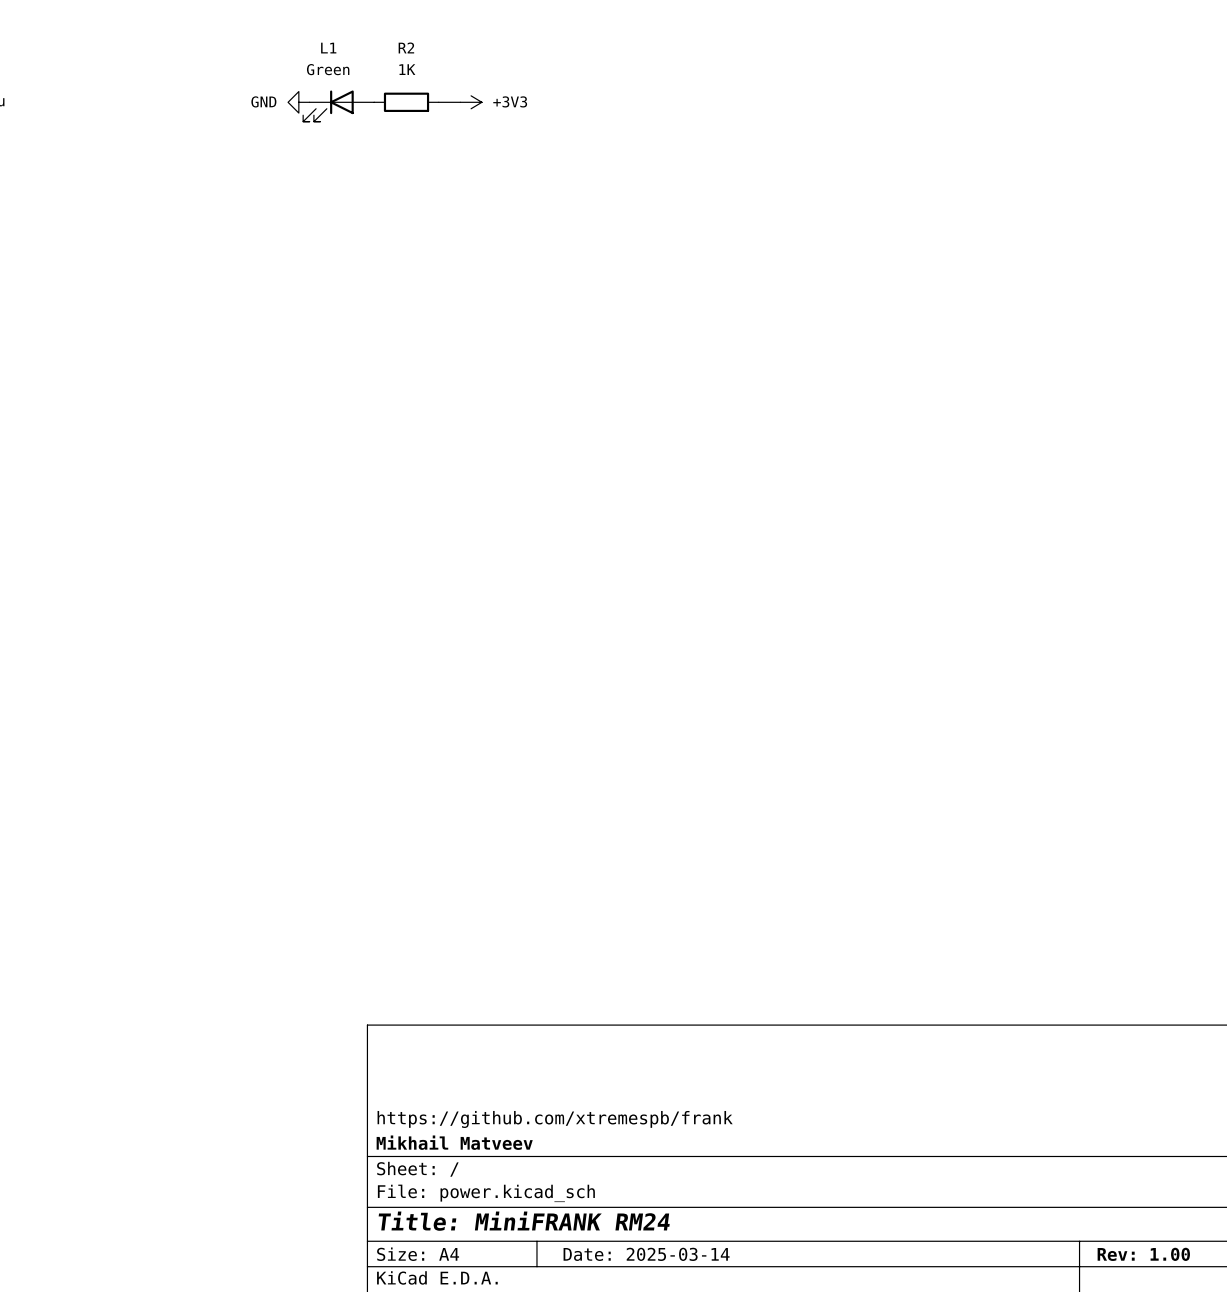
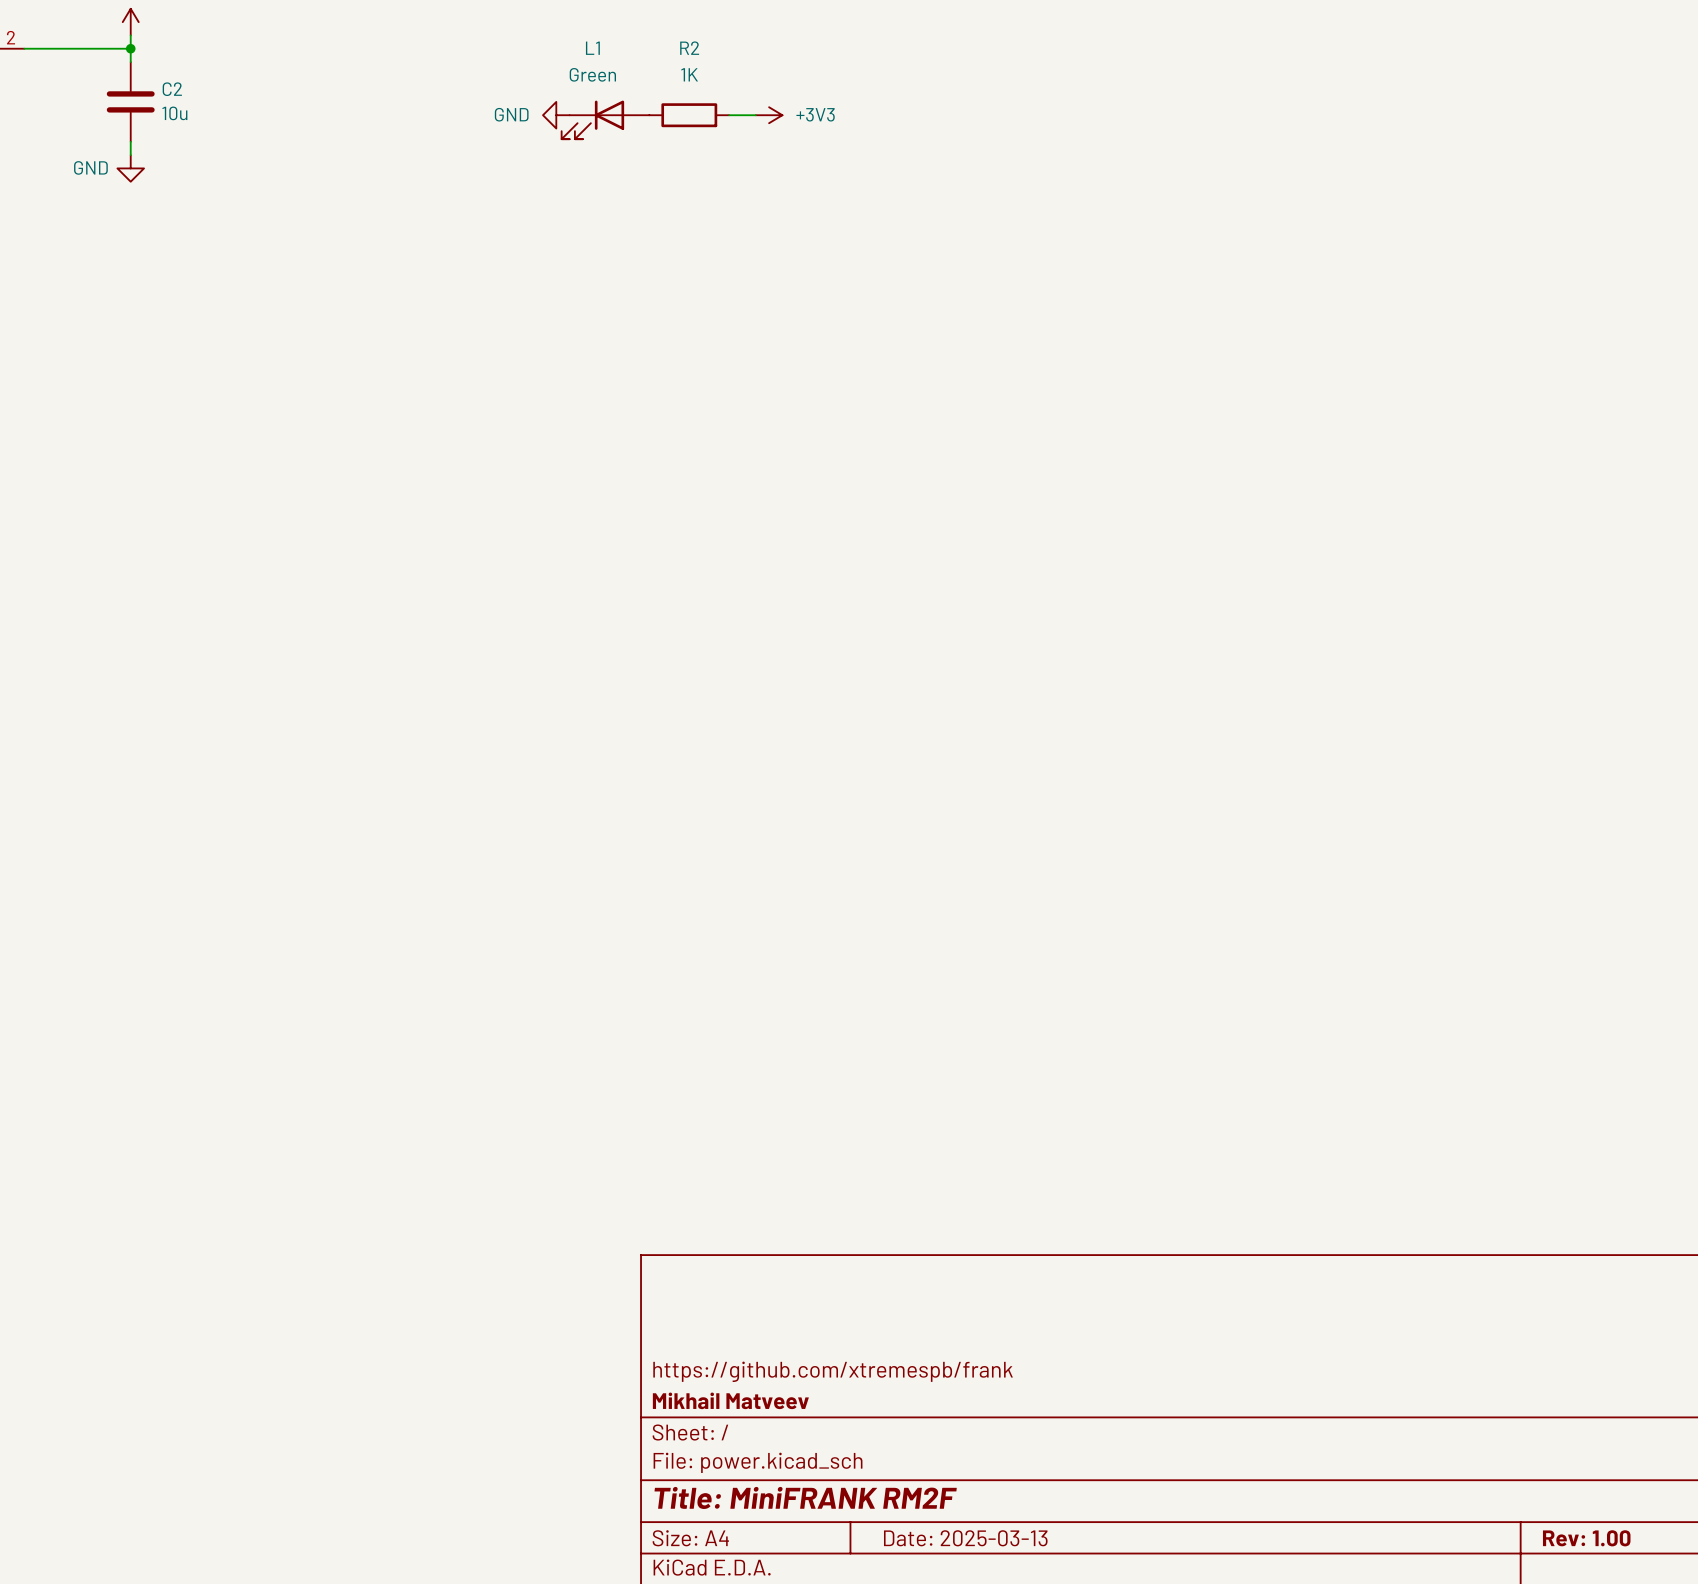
title block: Title: MiniFRANK RM24 (524, 1221) -> Title: MiniFRANK RM2F (805, 1497)
title block: Date: 2025-03-14 (646, 1254) -> Date: 2025-03-13 (965, 1538)

